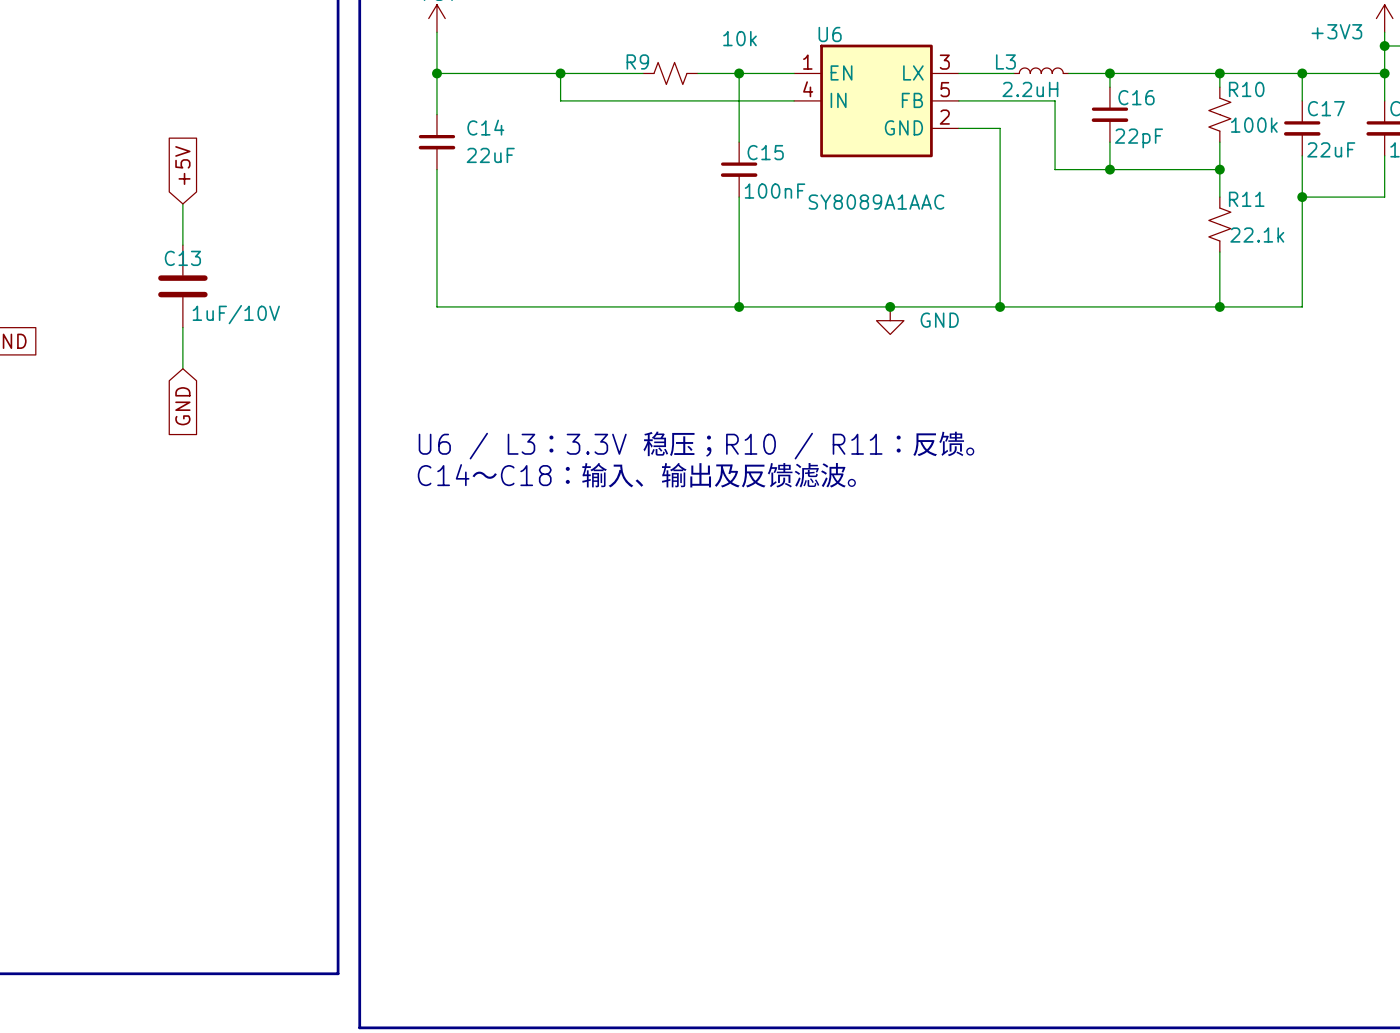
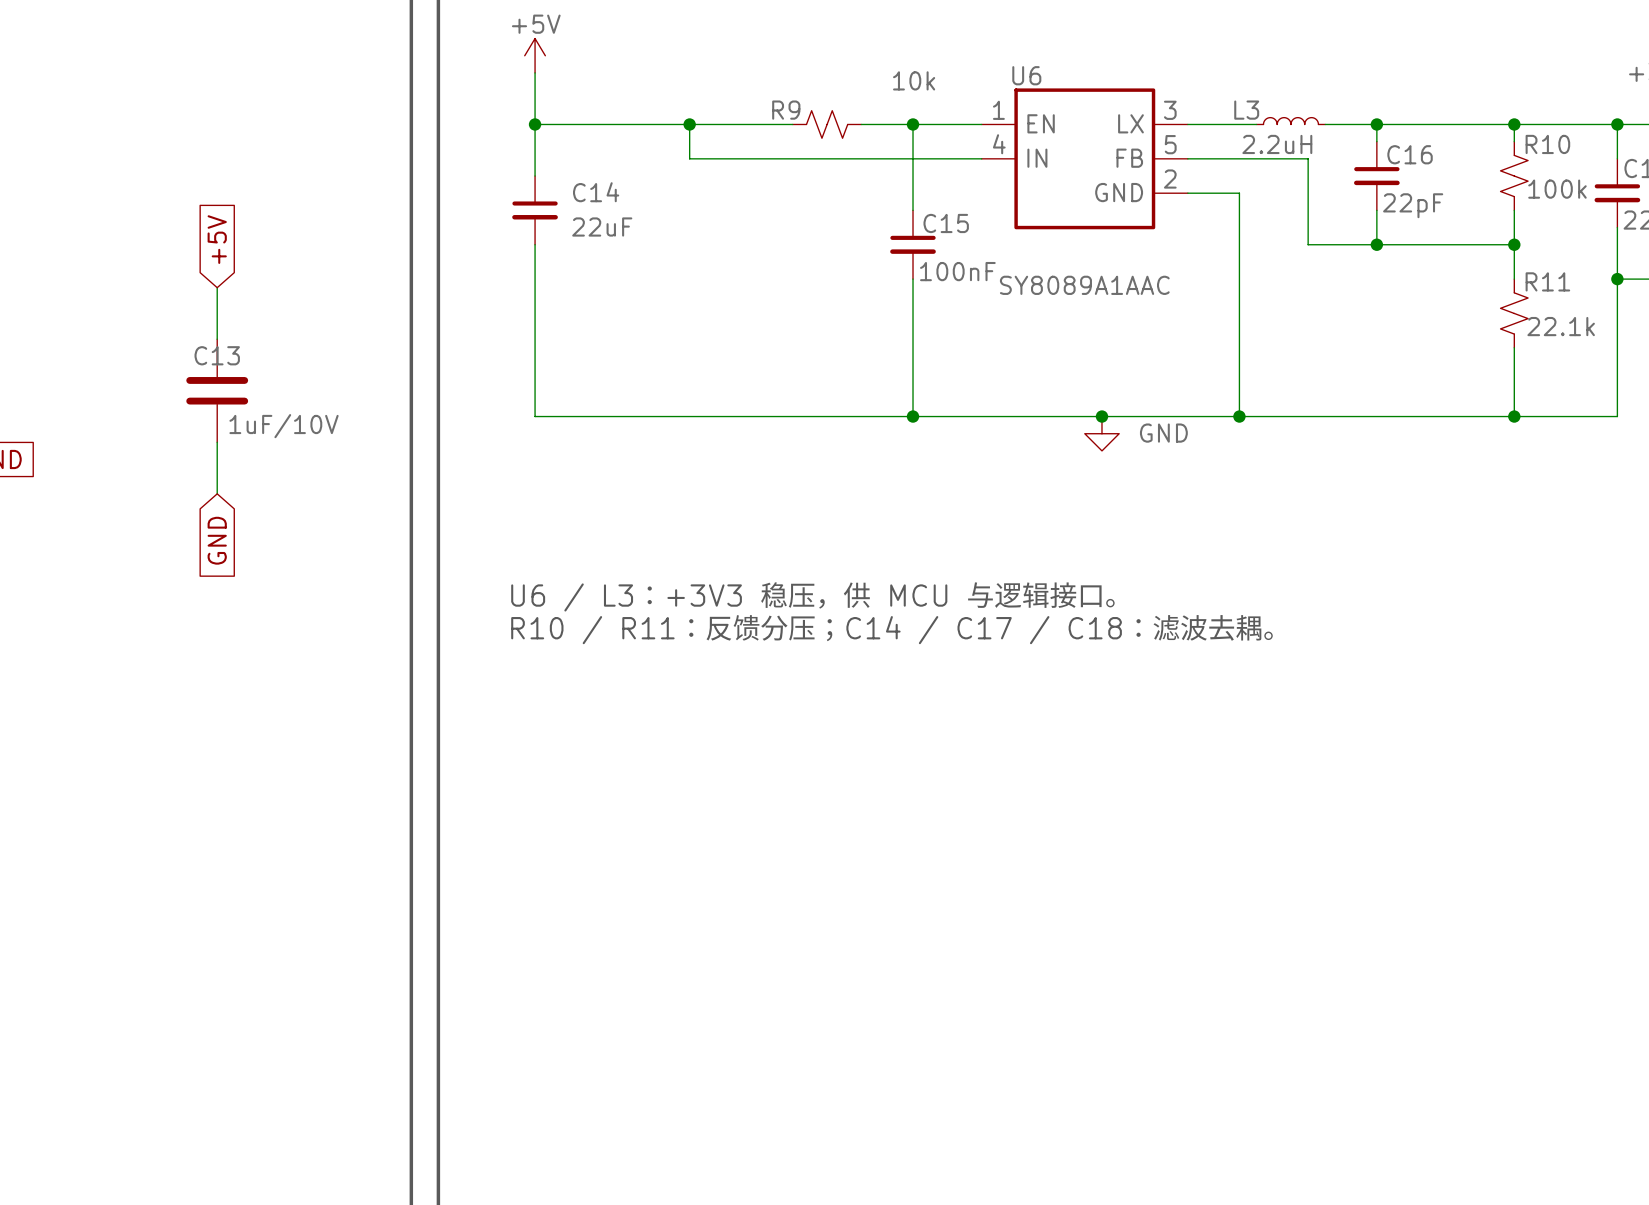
text: U6 / L3：3.3V 稳压；R10 / R11：反馈。 (696, 445) -> U6 / L3：+3V3 稳压，供 MCU 与逻辑接口。 (813, 596)
text: C14～C18：输入、输出及反馈滤波。 (637, 475) -> R10 / R11：反馈分压；C14 / C17 / C18：滤波去耦。 (892, 629)

